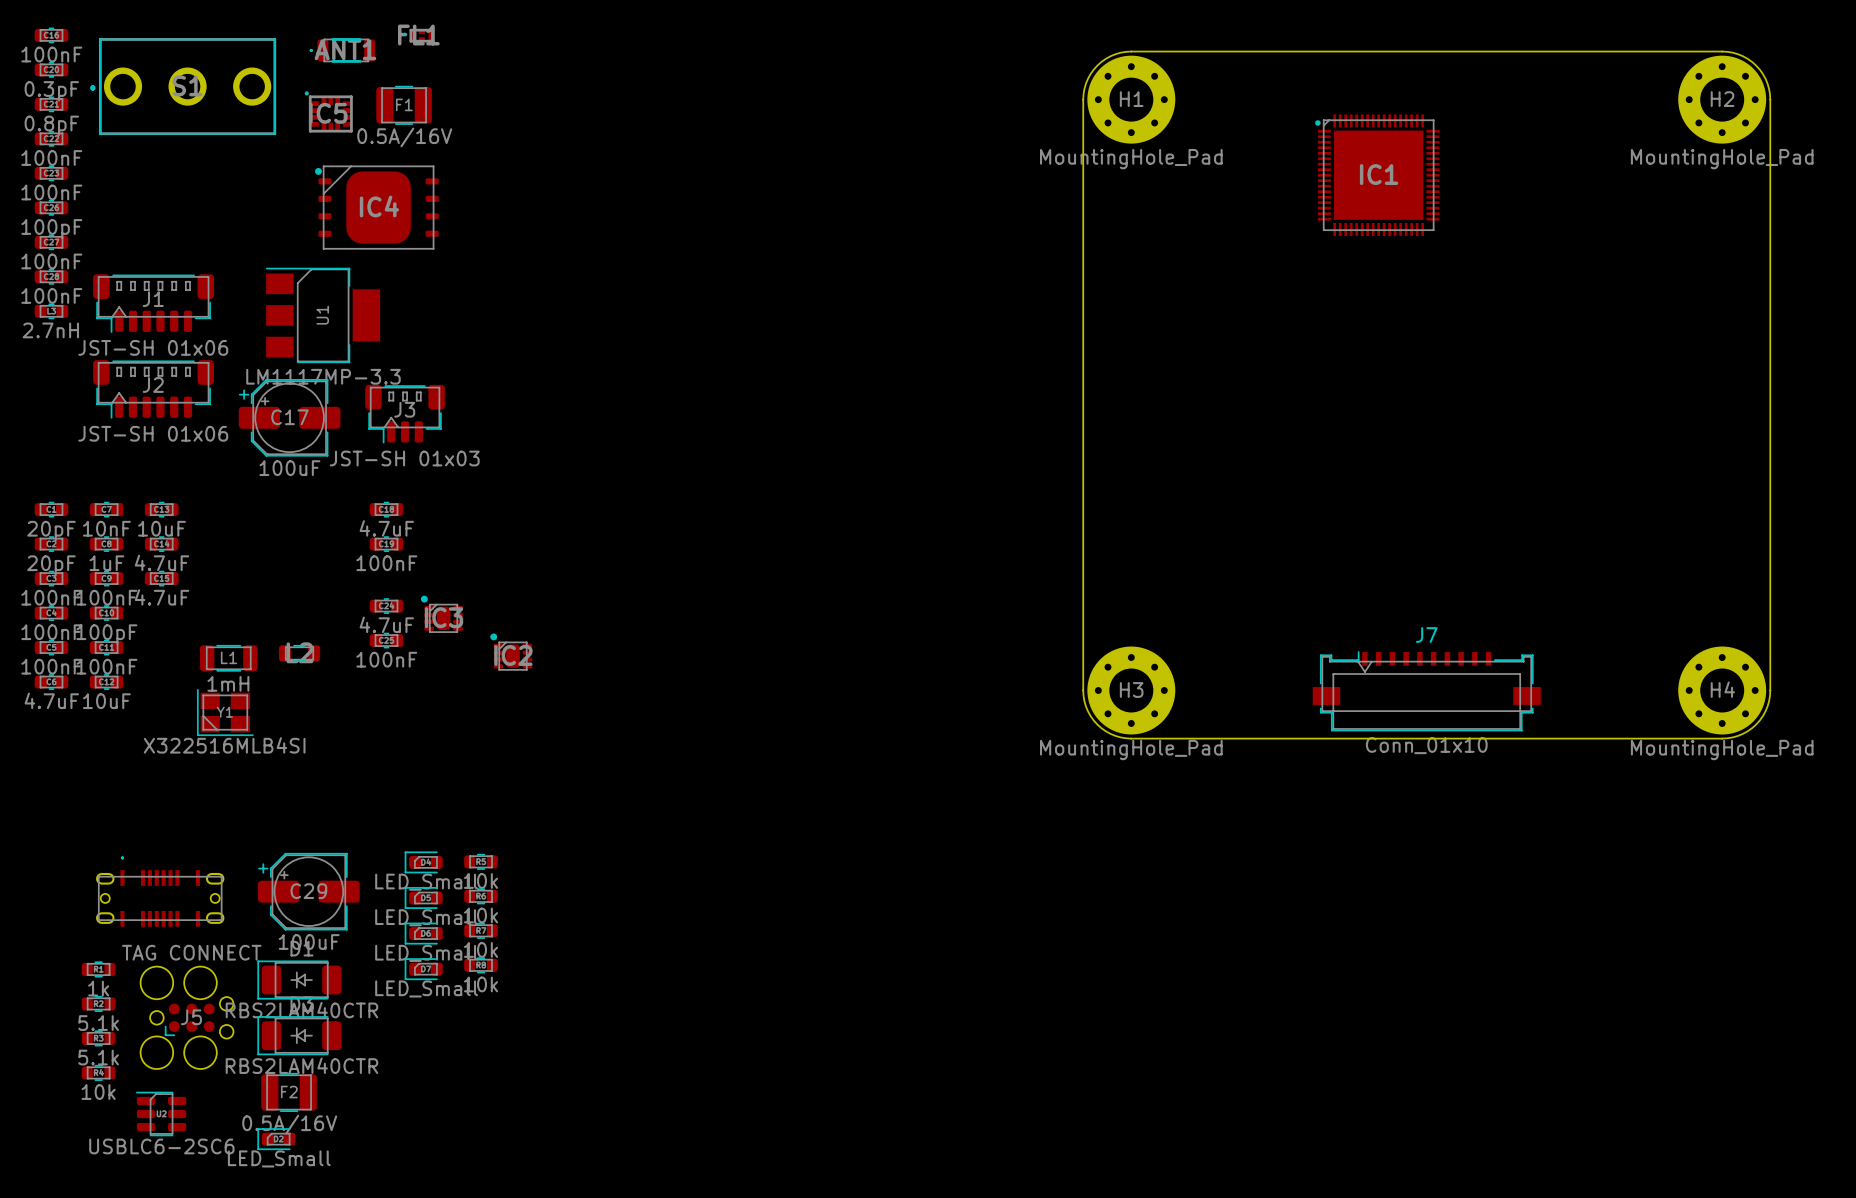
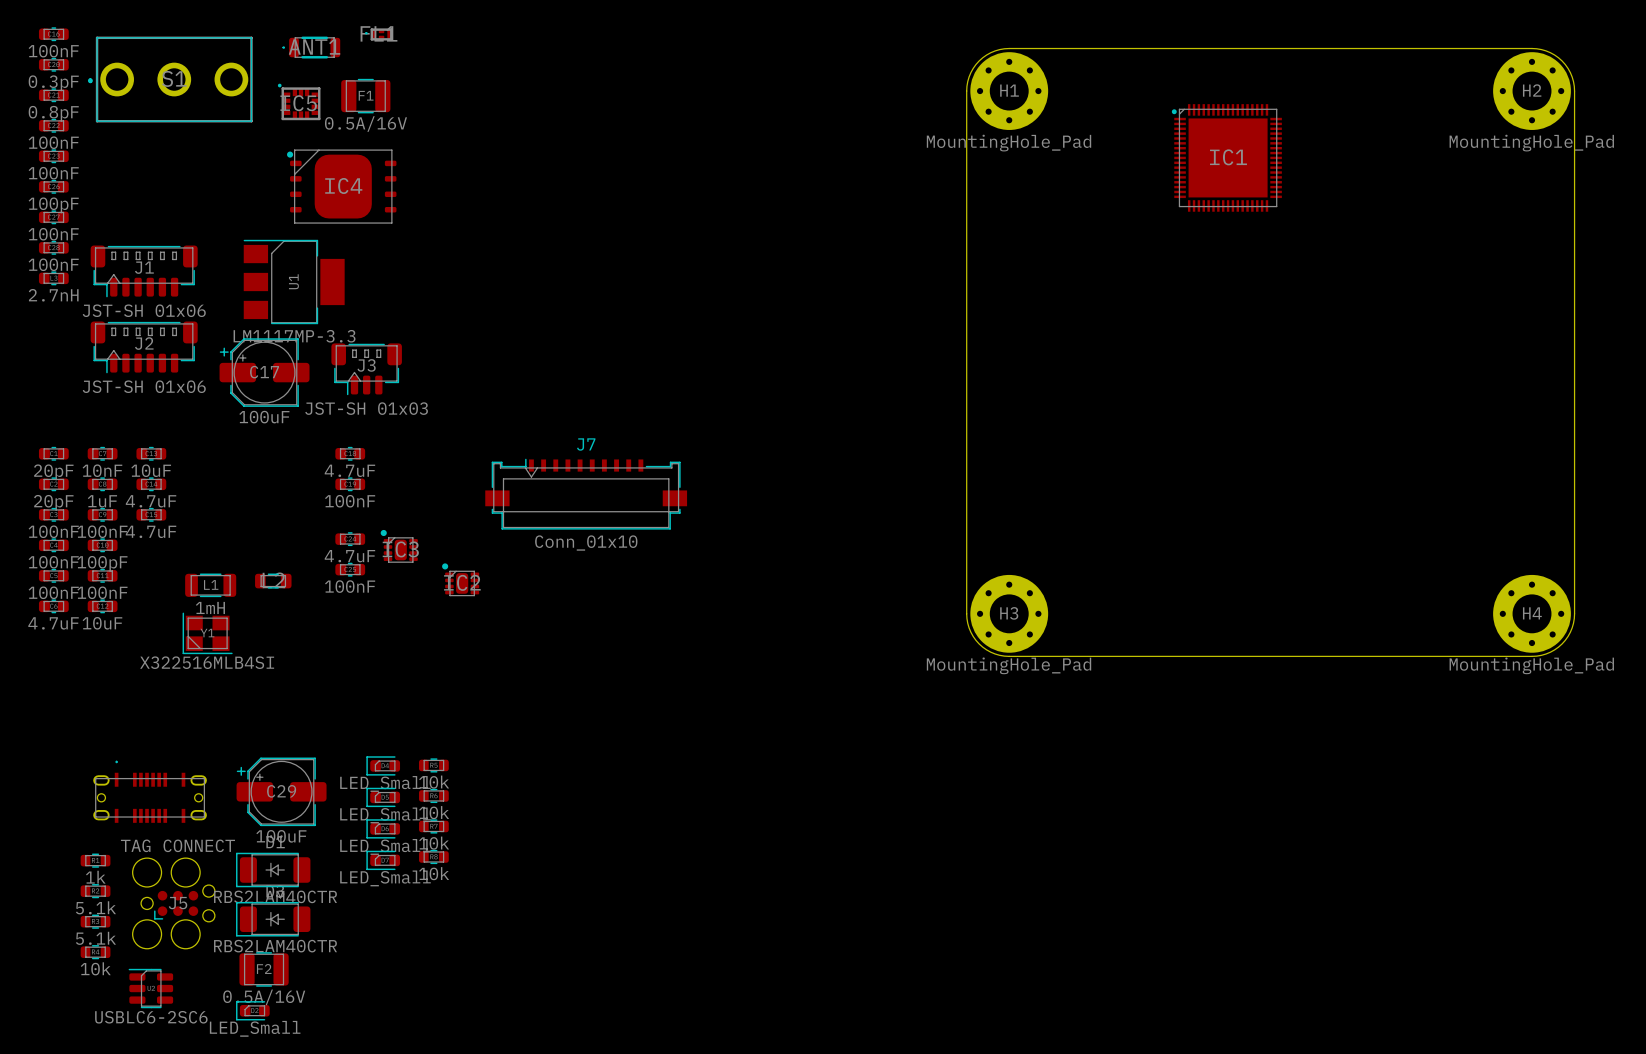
J7 position: (1426, 691) -> (586, 494)

